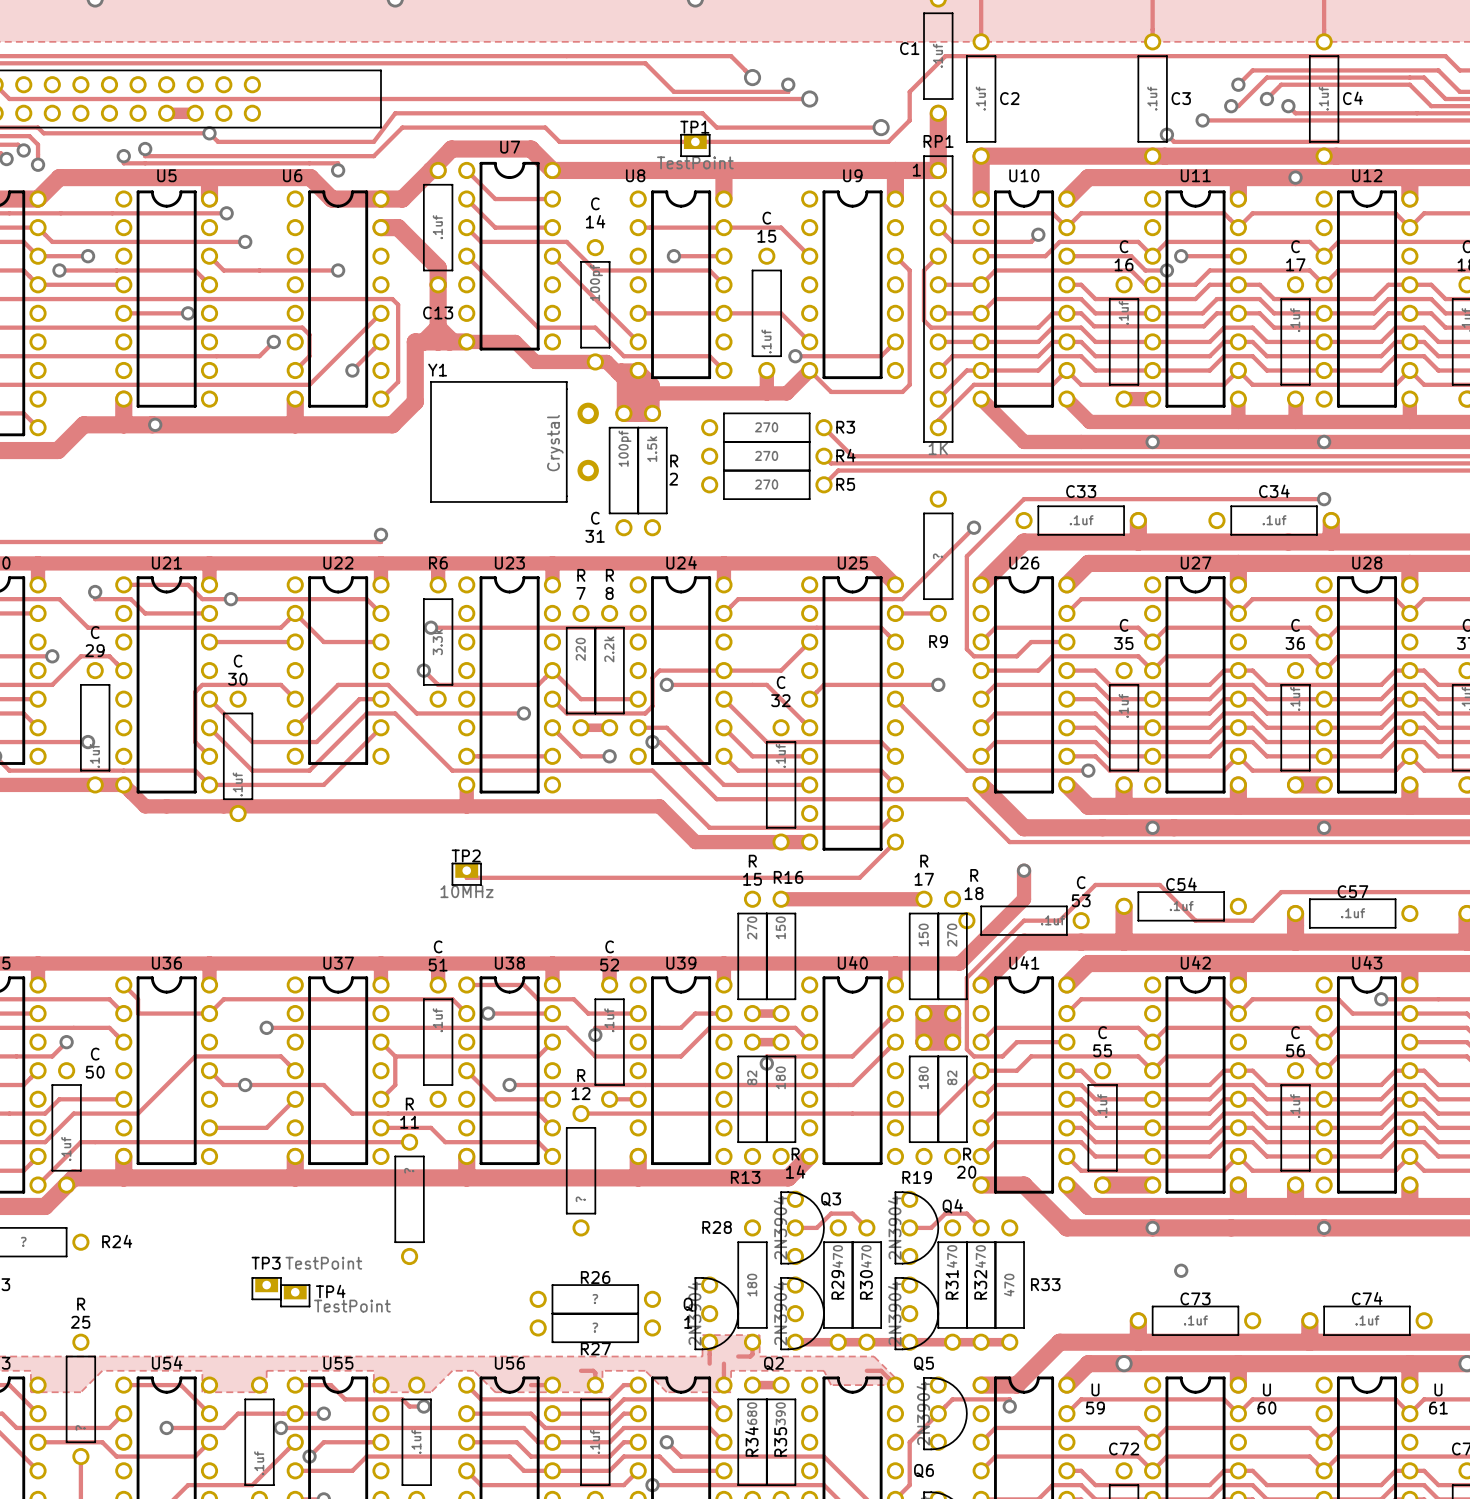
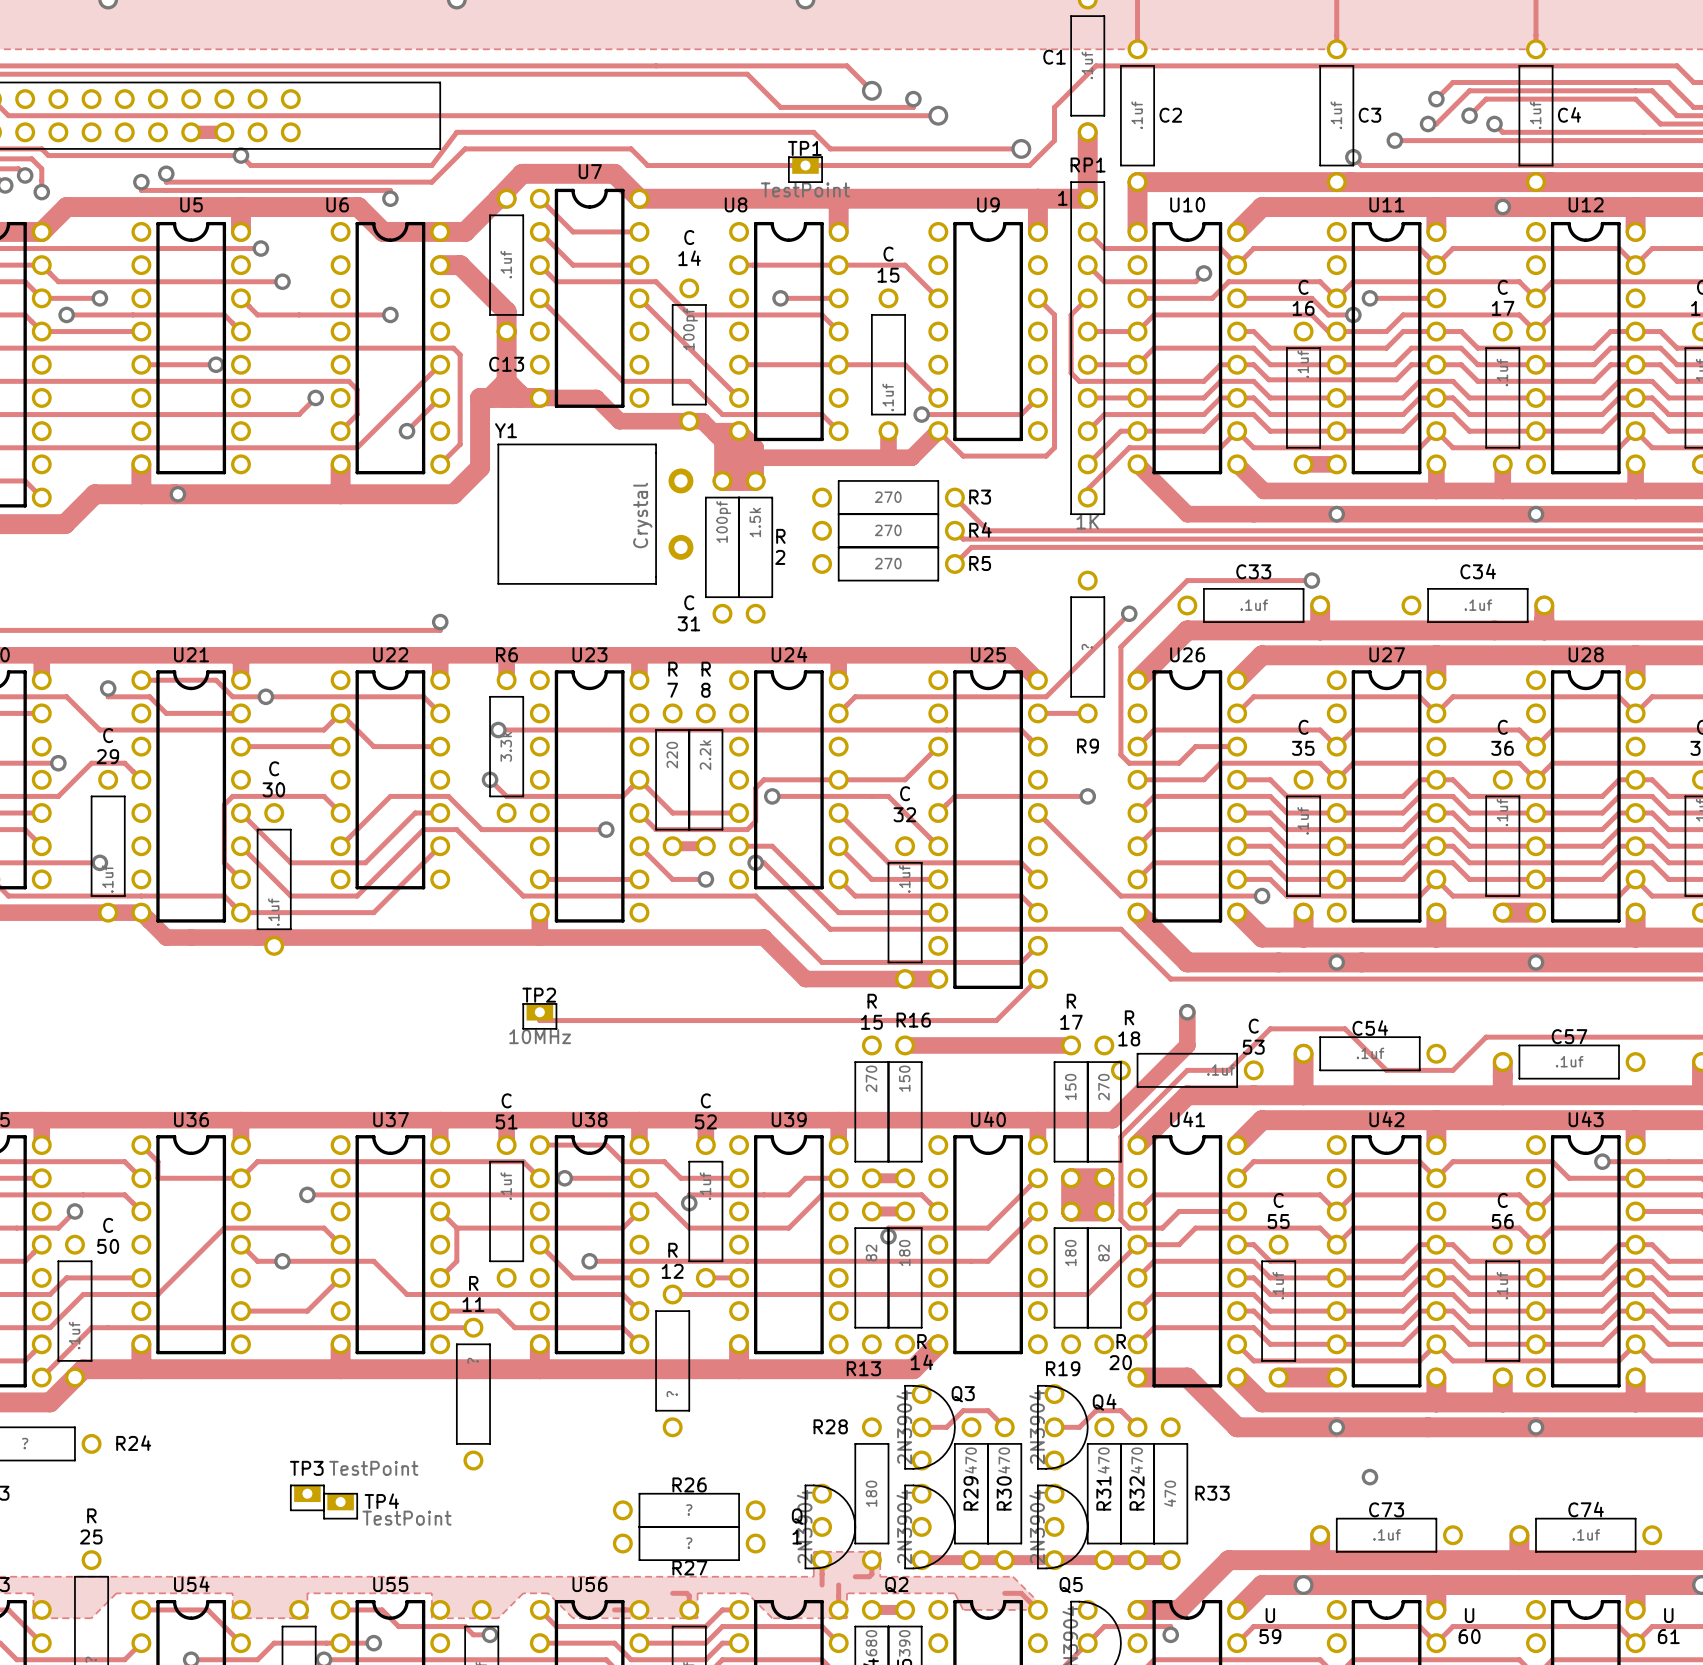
track: (1131, 499) (1324, 499) -> none
via: none -> (1311, 580)
via: (1324, 499) -> none

